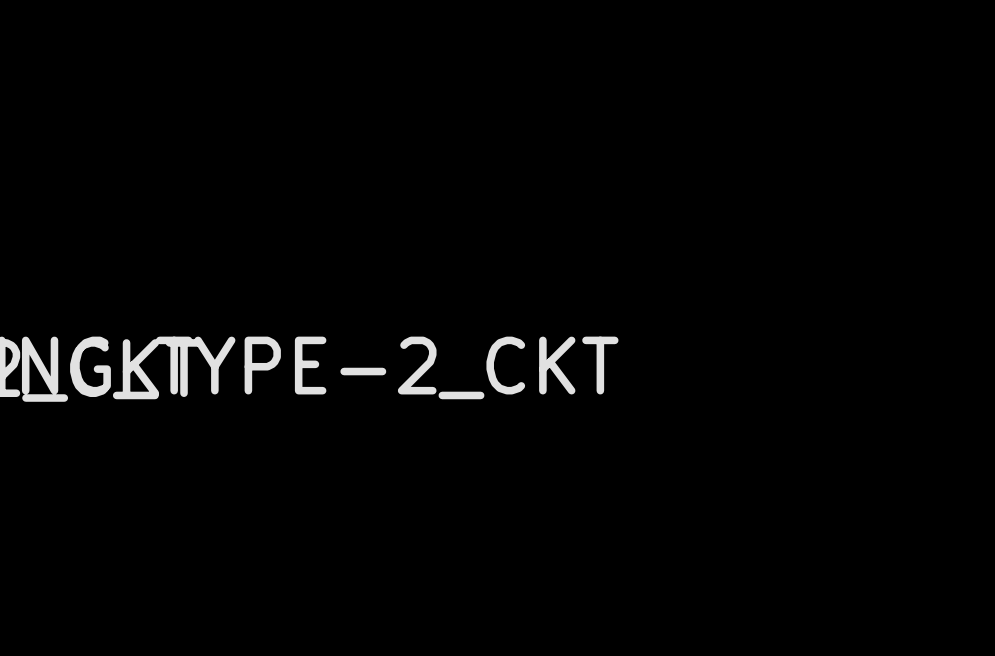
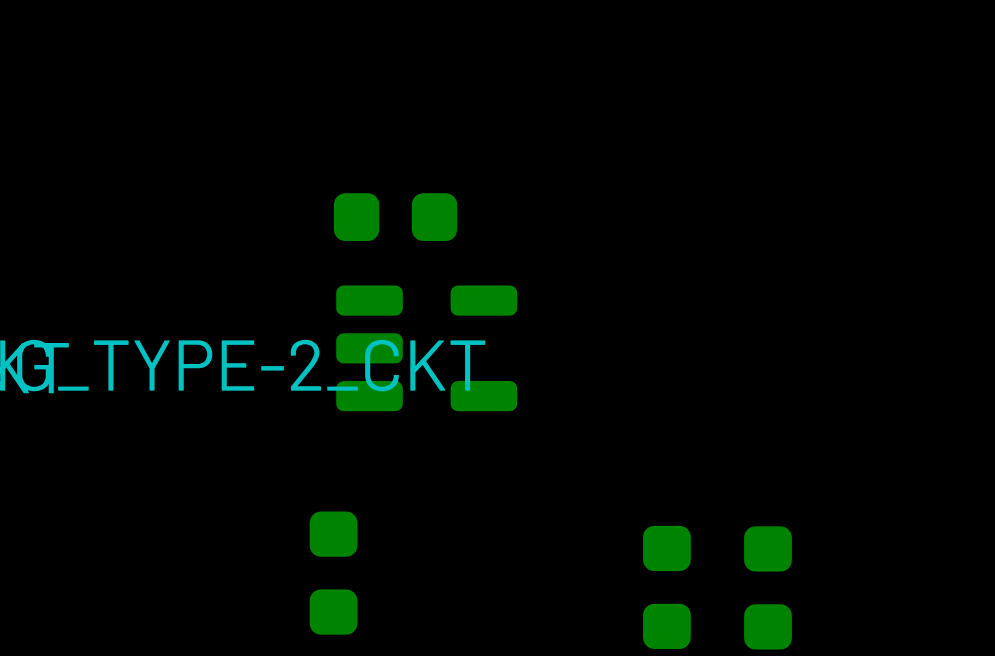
part: none -> (395, 217)
part: none -> (426, 348)
part: none -> (333, 573)
part: none -> (666, 587)
part: none -> (767, 587)

